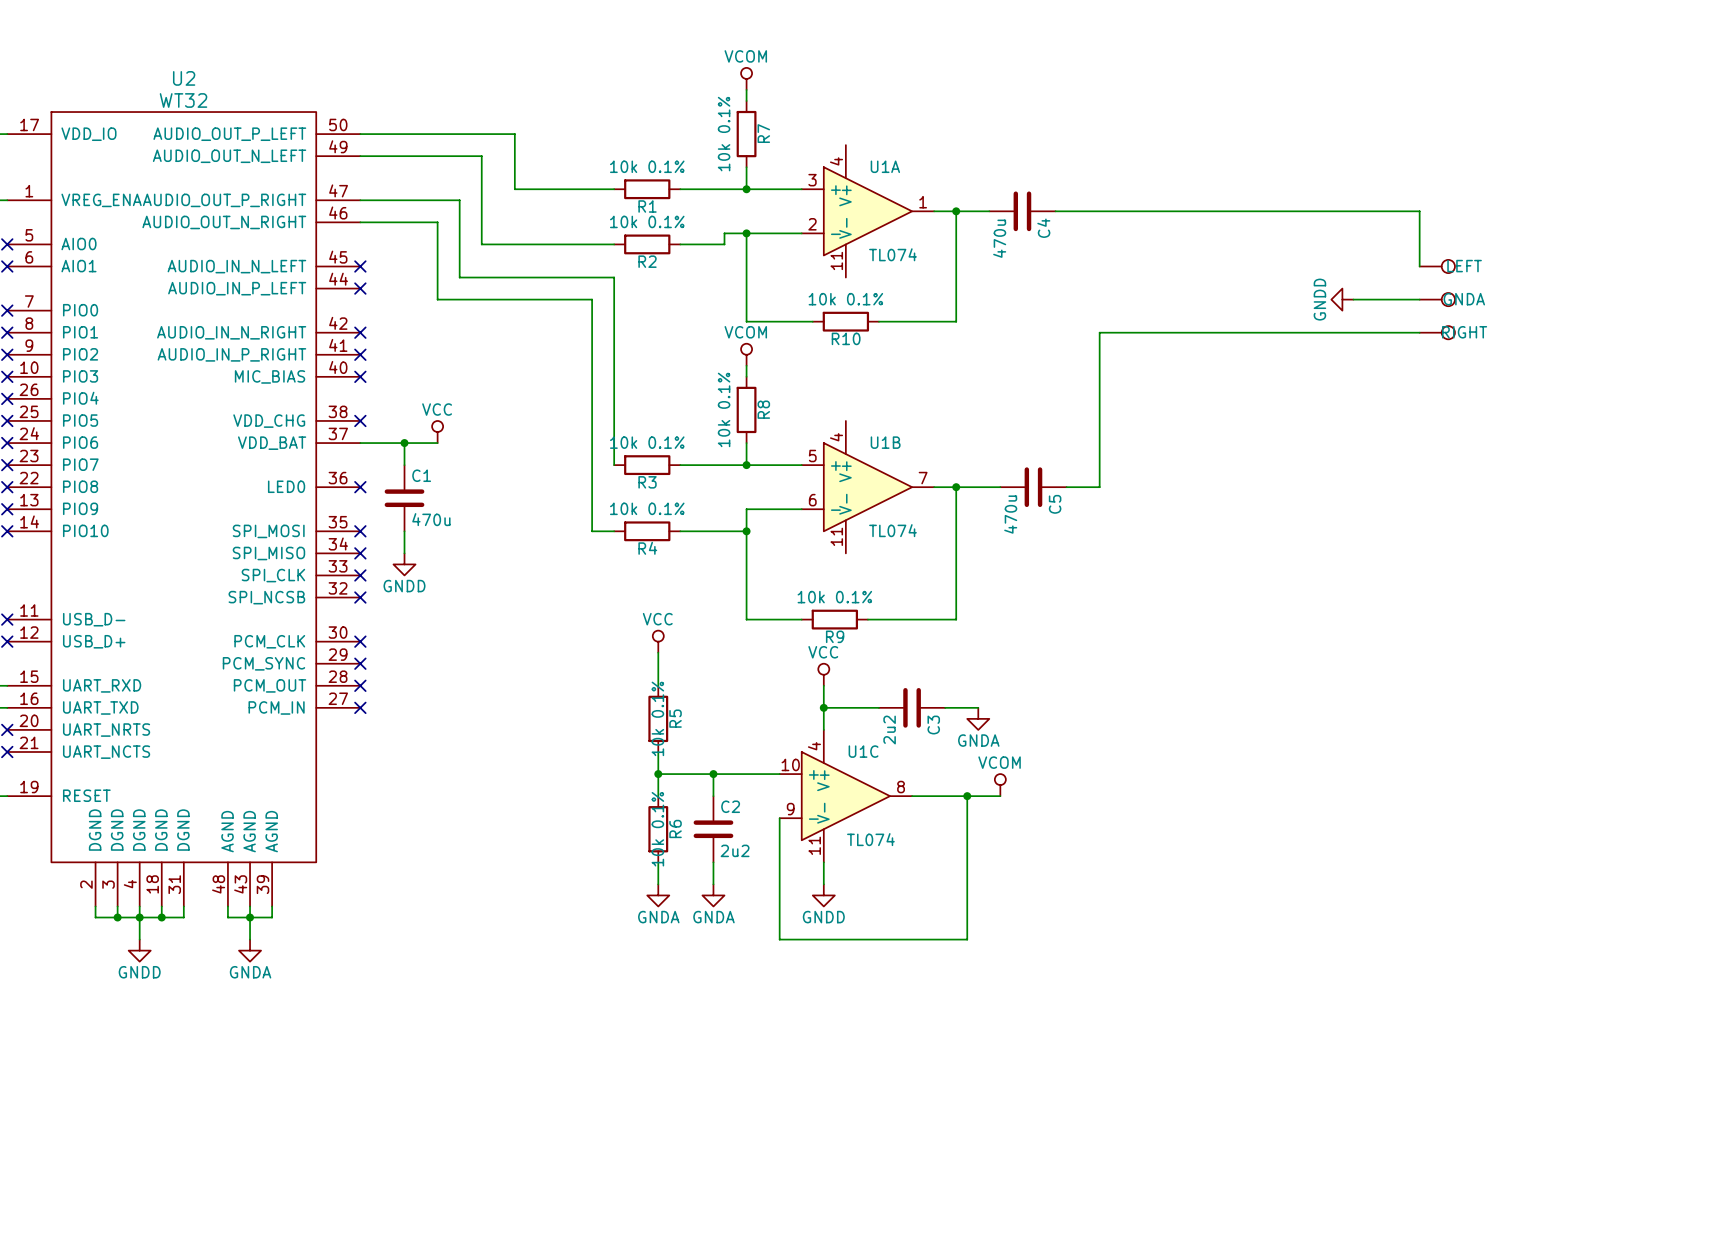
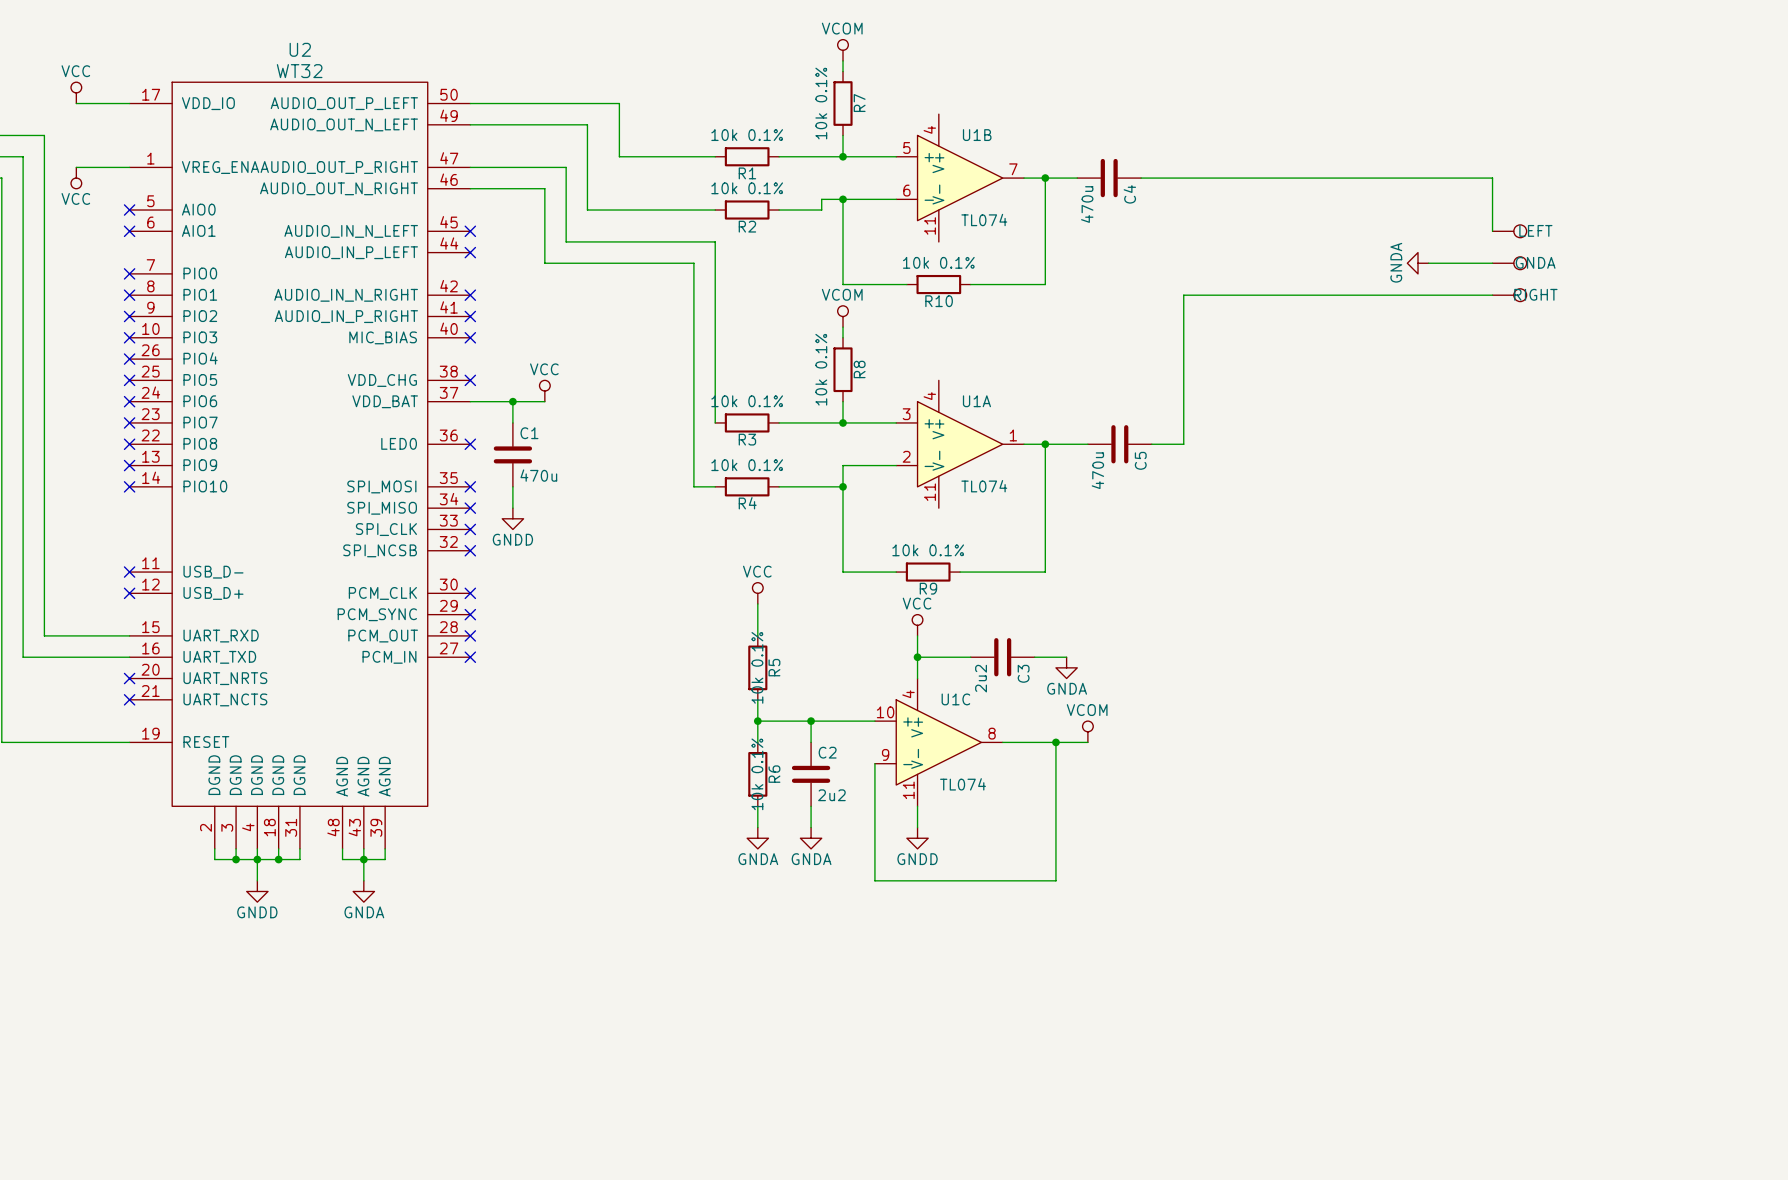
U1A position: (867, 211) -> (960, 444)
power symbol: GNDD (1342, 299) -> GNDA (1418, 263)
U1B position: (867, 487) -> (960, 178)

